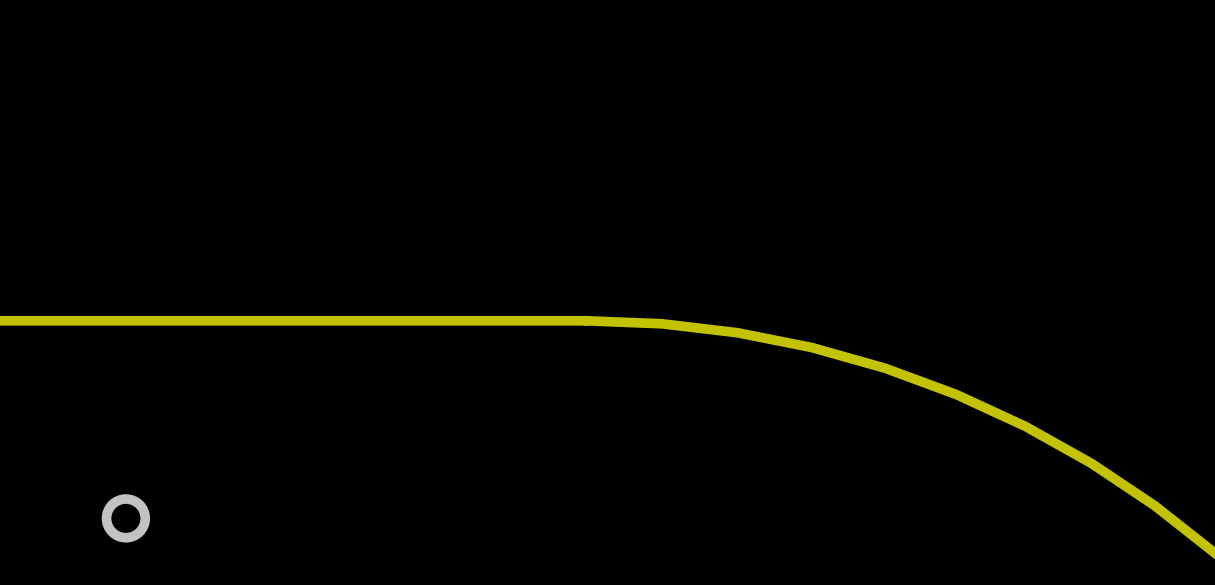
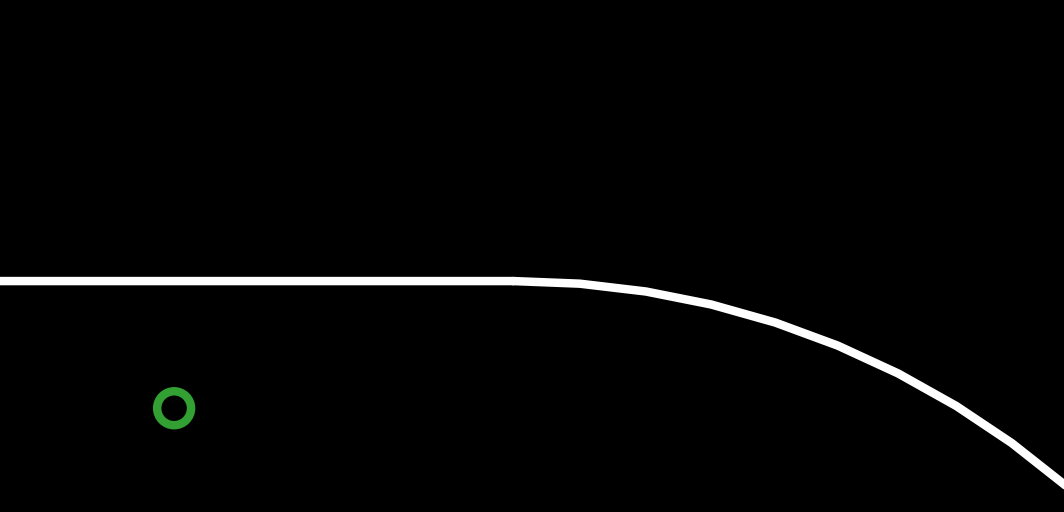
via position: (125, 518) -> (174, 408)

